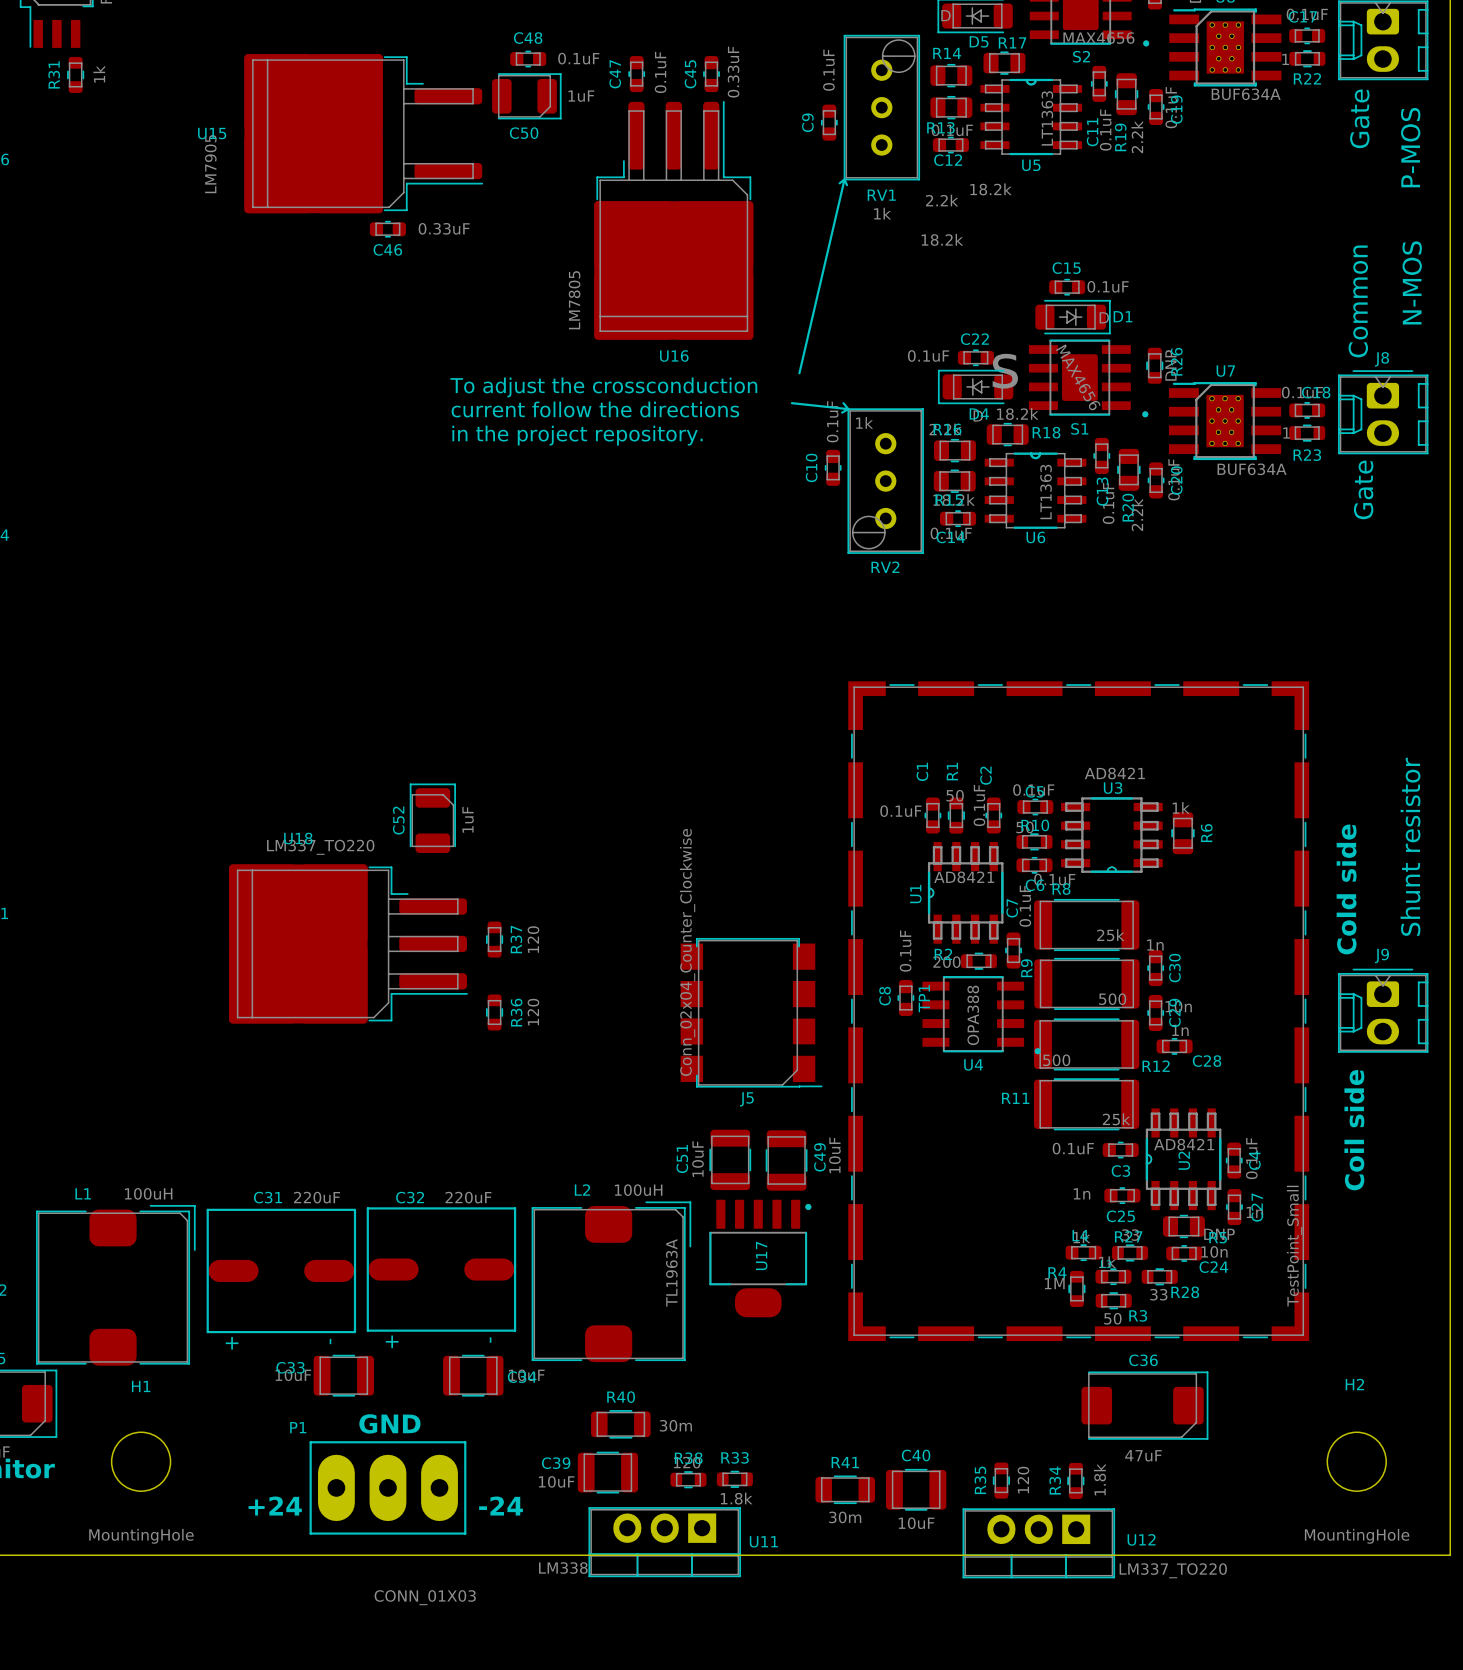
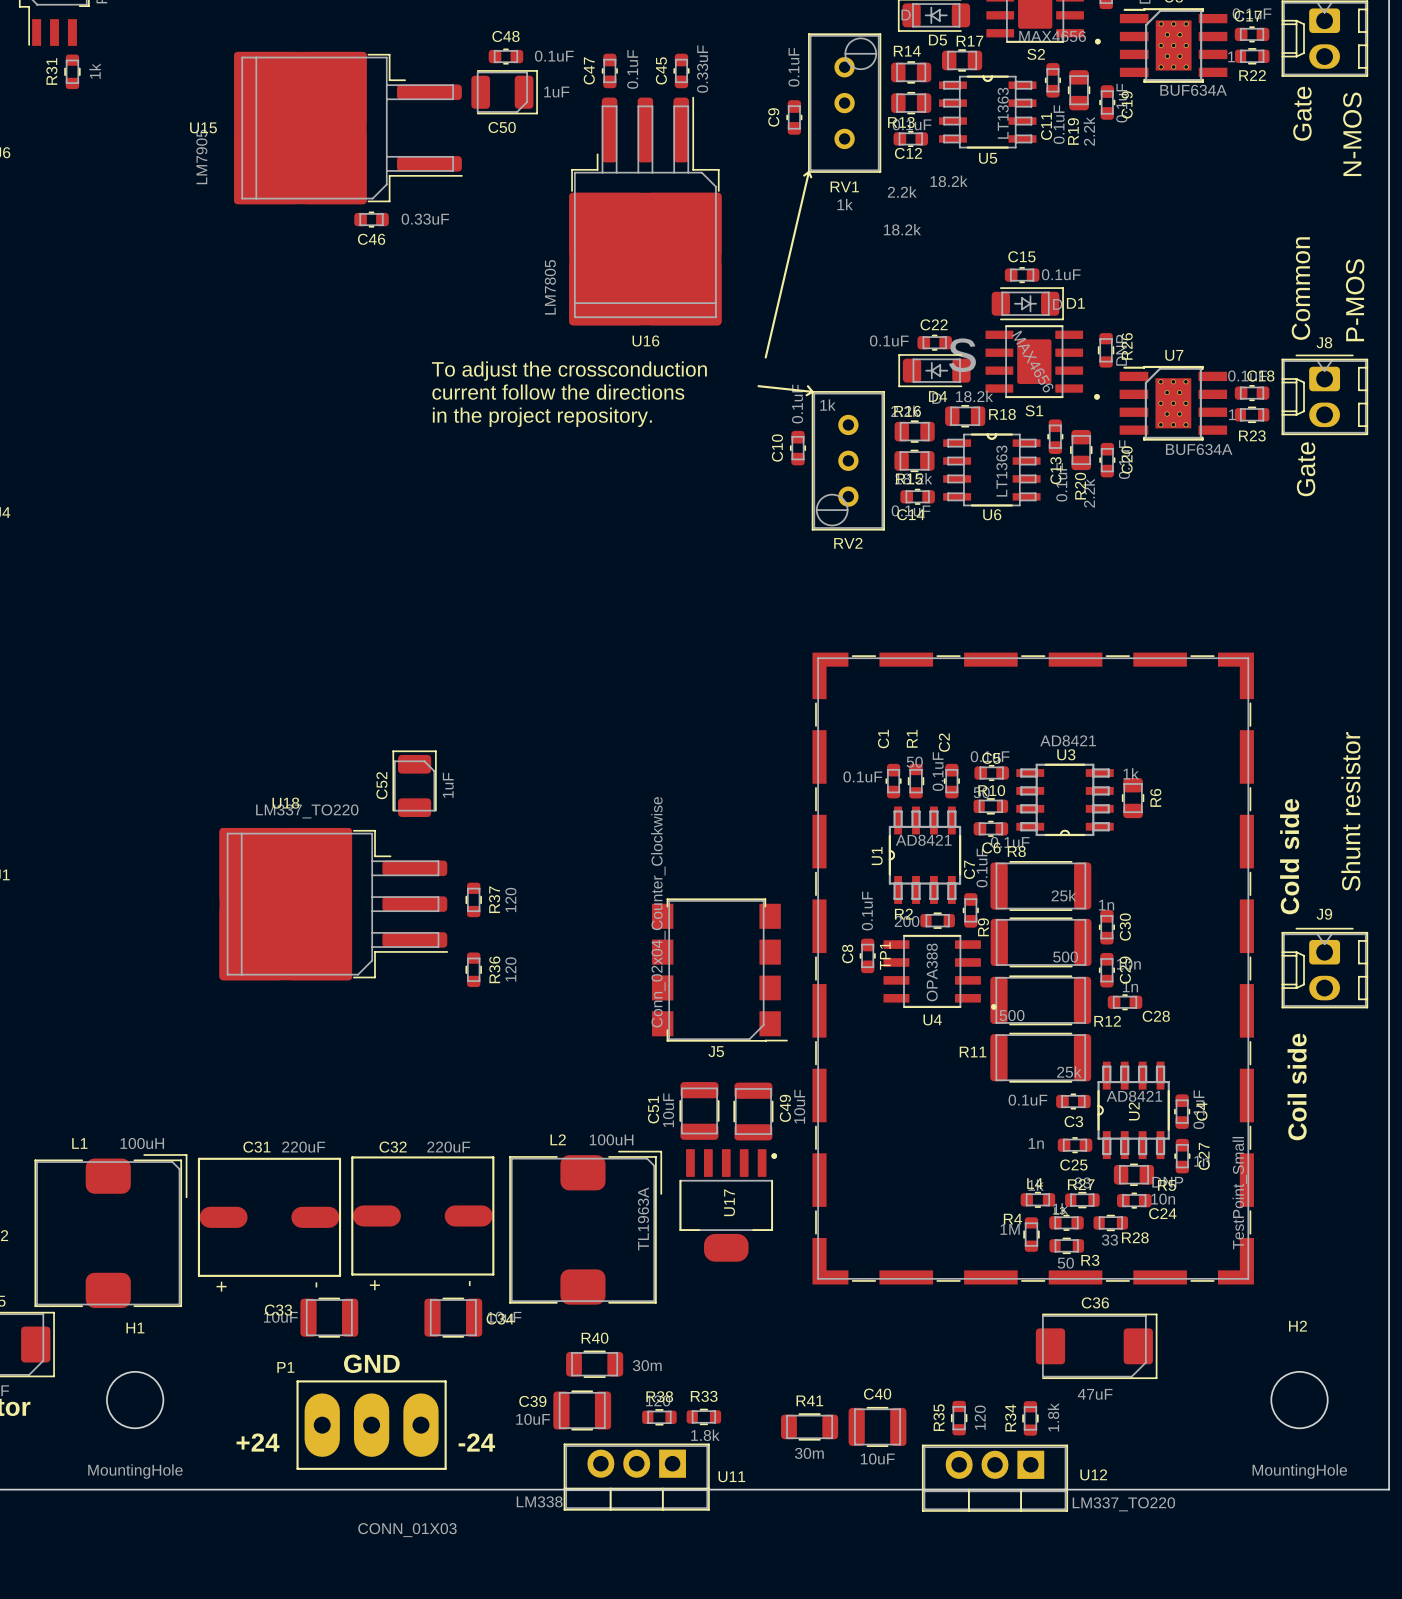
part value: P-MOS (1410, 147) -> N-MOS (1352, 134)
J8 value: N-MOS (1412, 282) -> P-MOS (1355, 300)

